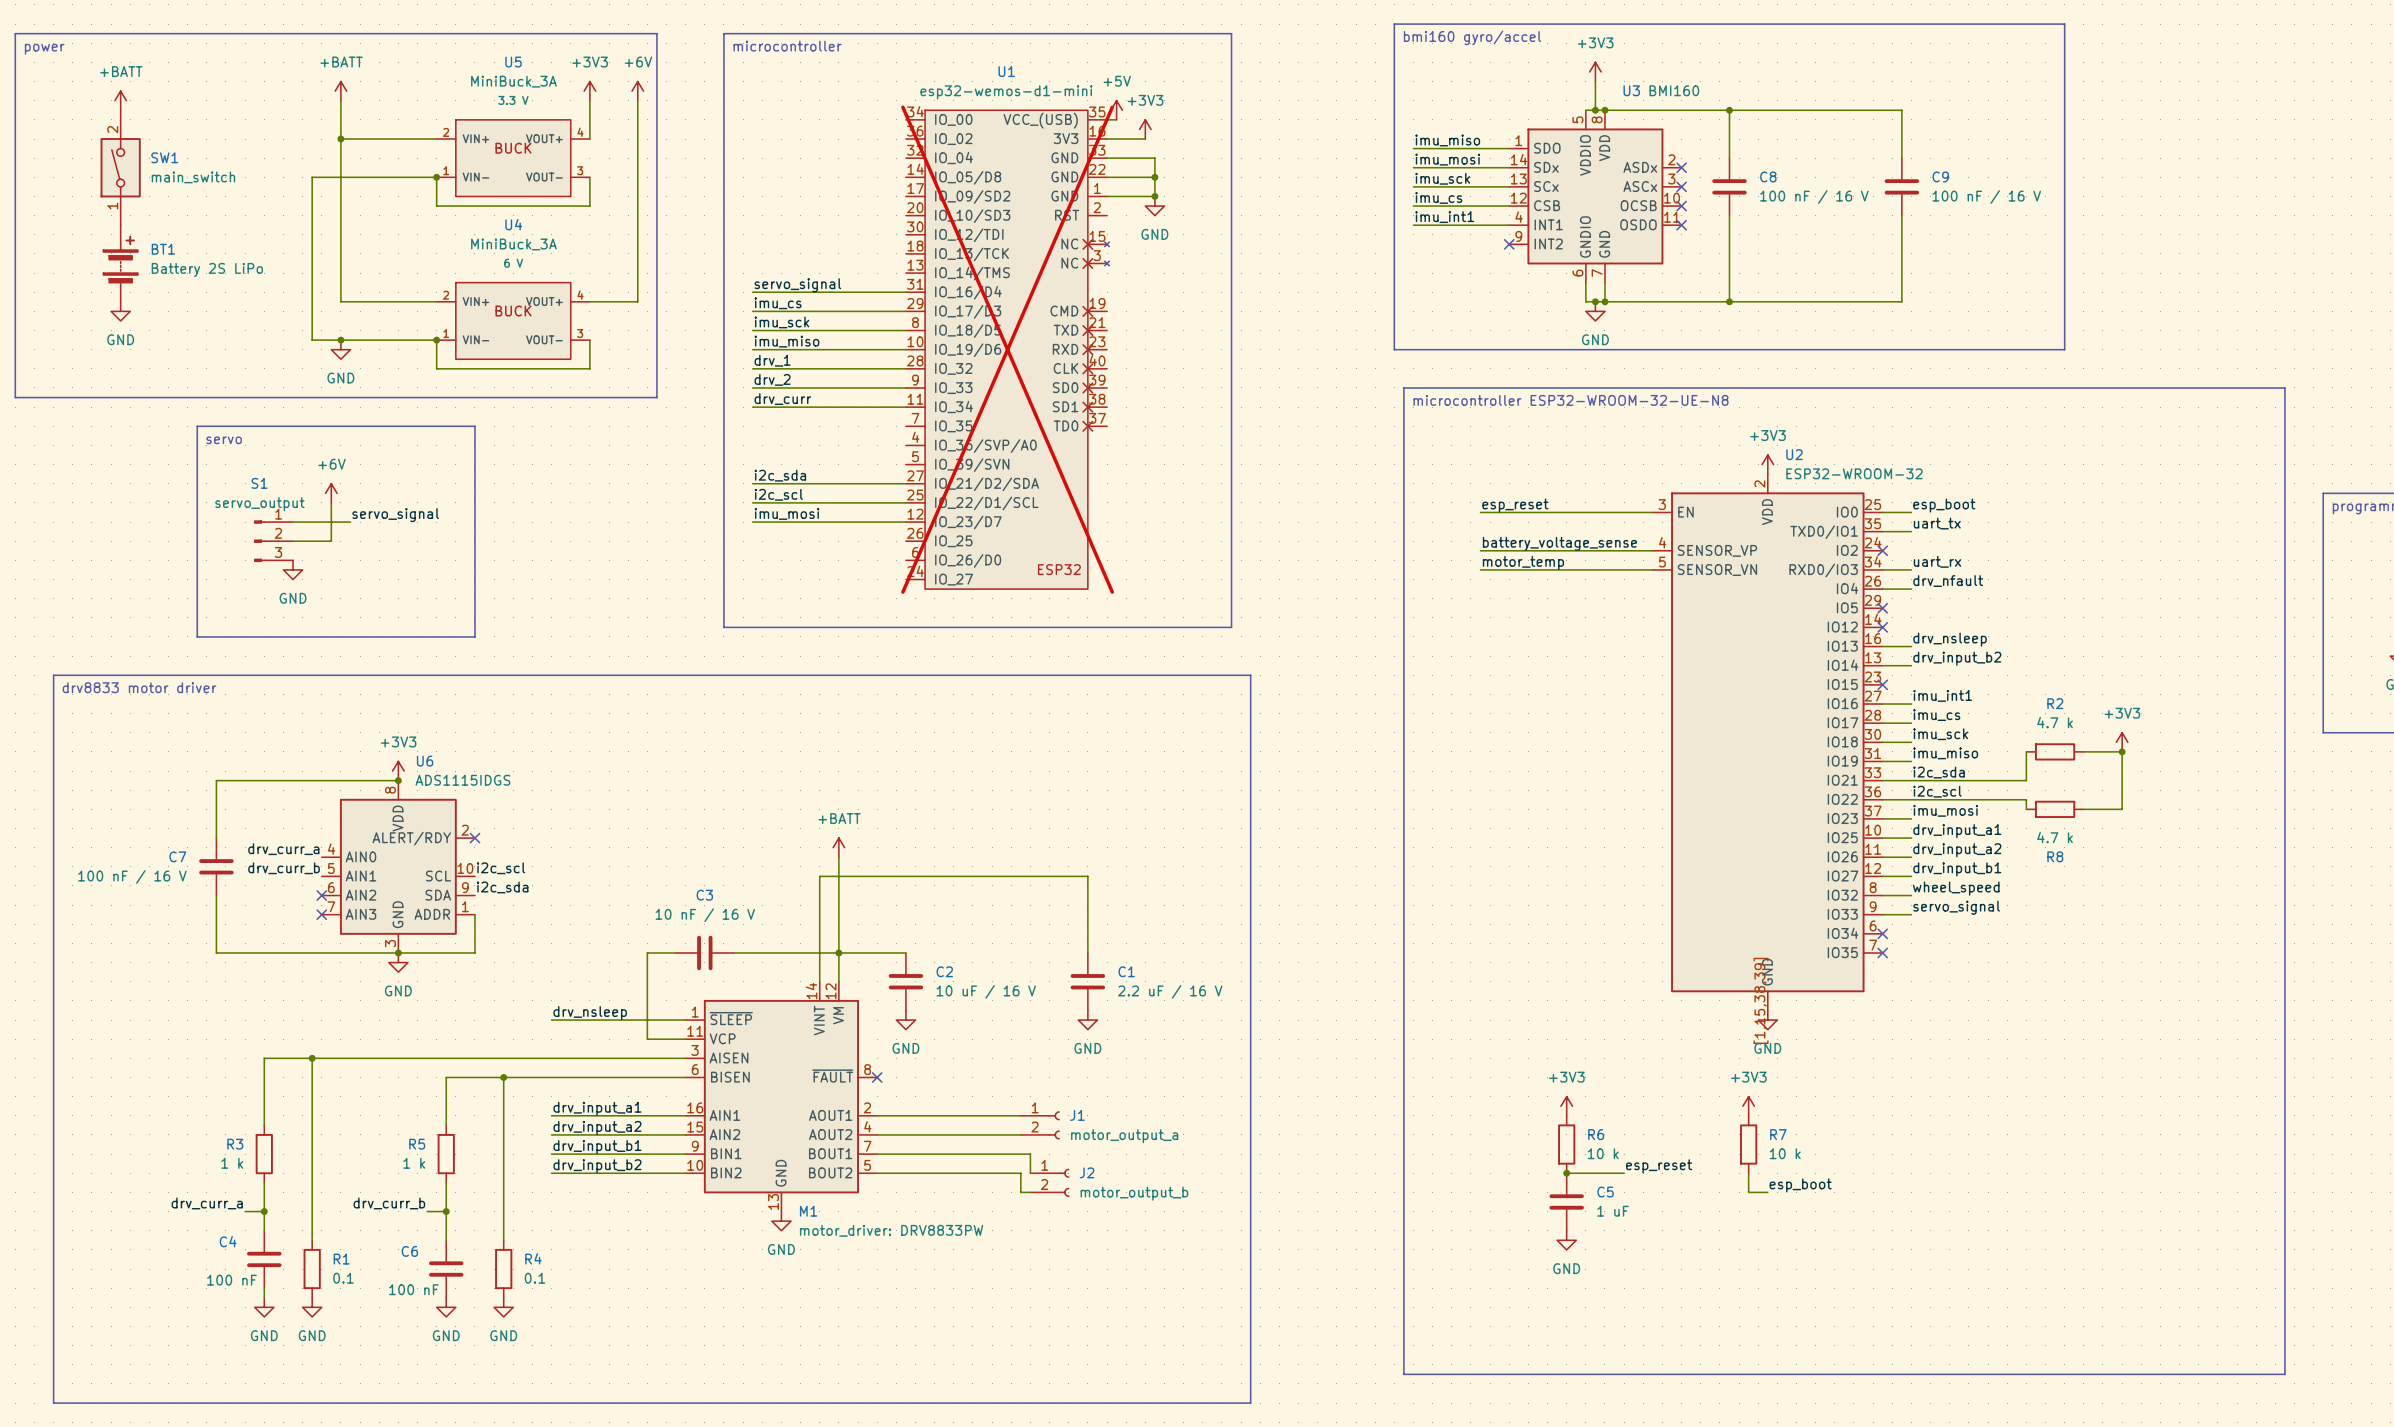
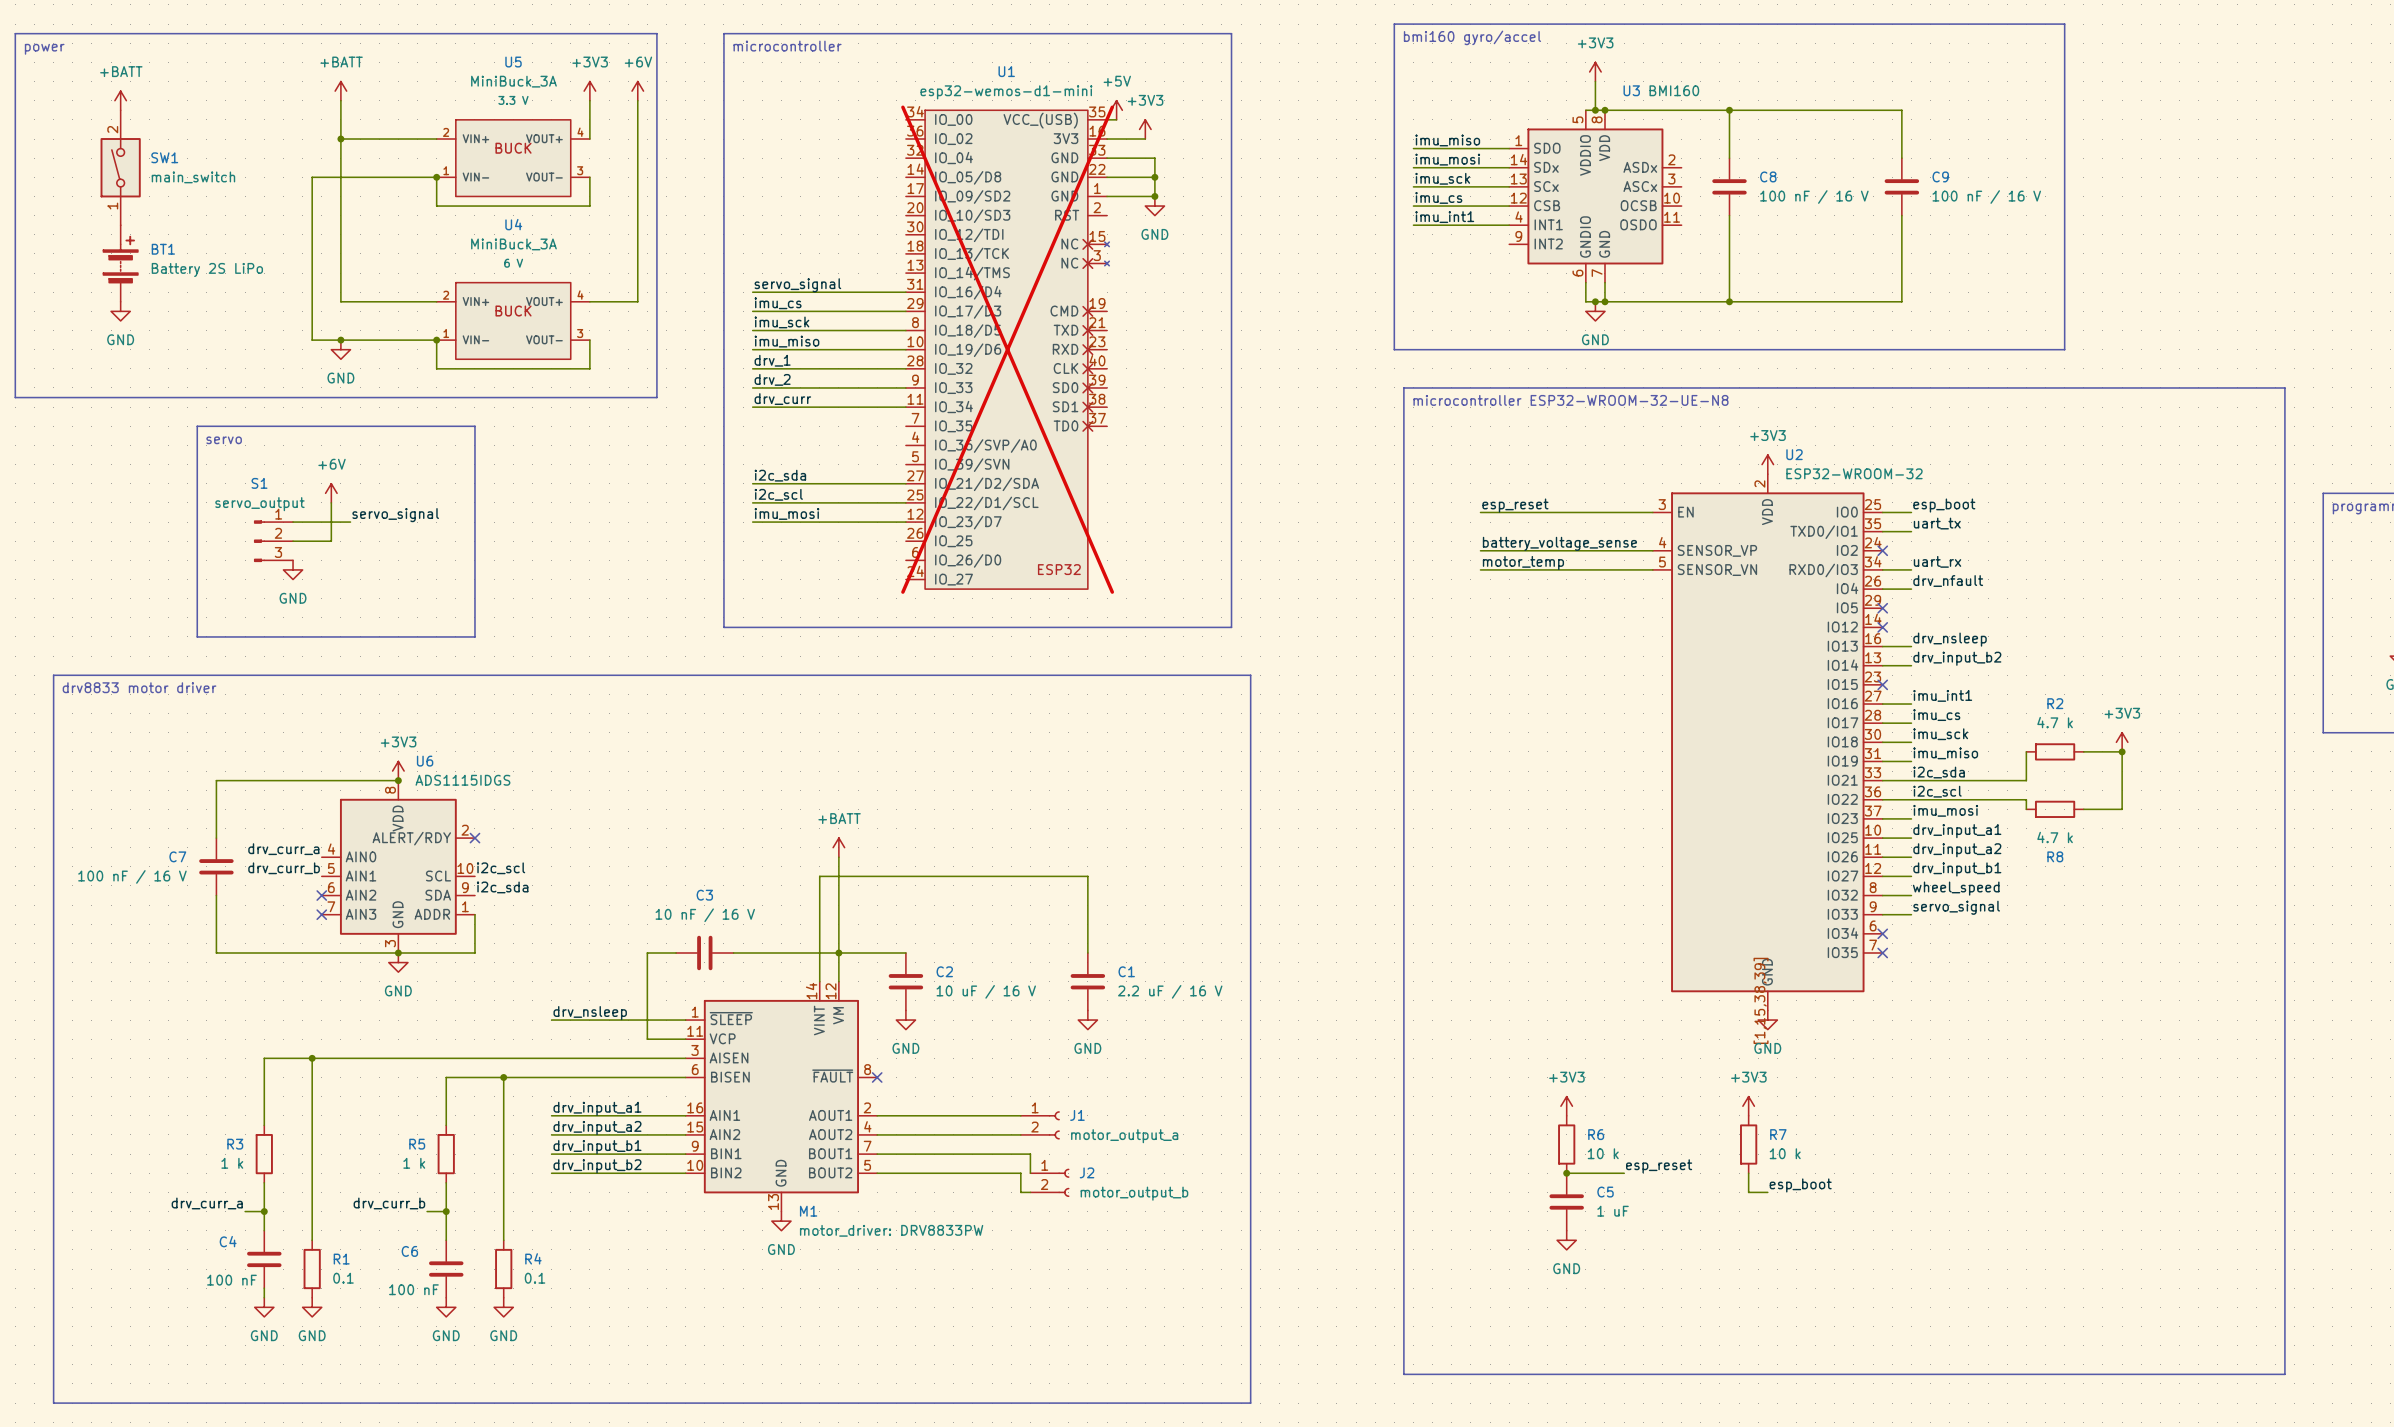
no-connect mark: (1681, 167) -> none
no-connect mark: (1681, 186) -> none
no-connect mark: (1681, 206) -> none
no-connect mark: (1681, 225) -> none
no-connect mark: (1509, 244) -> none

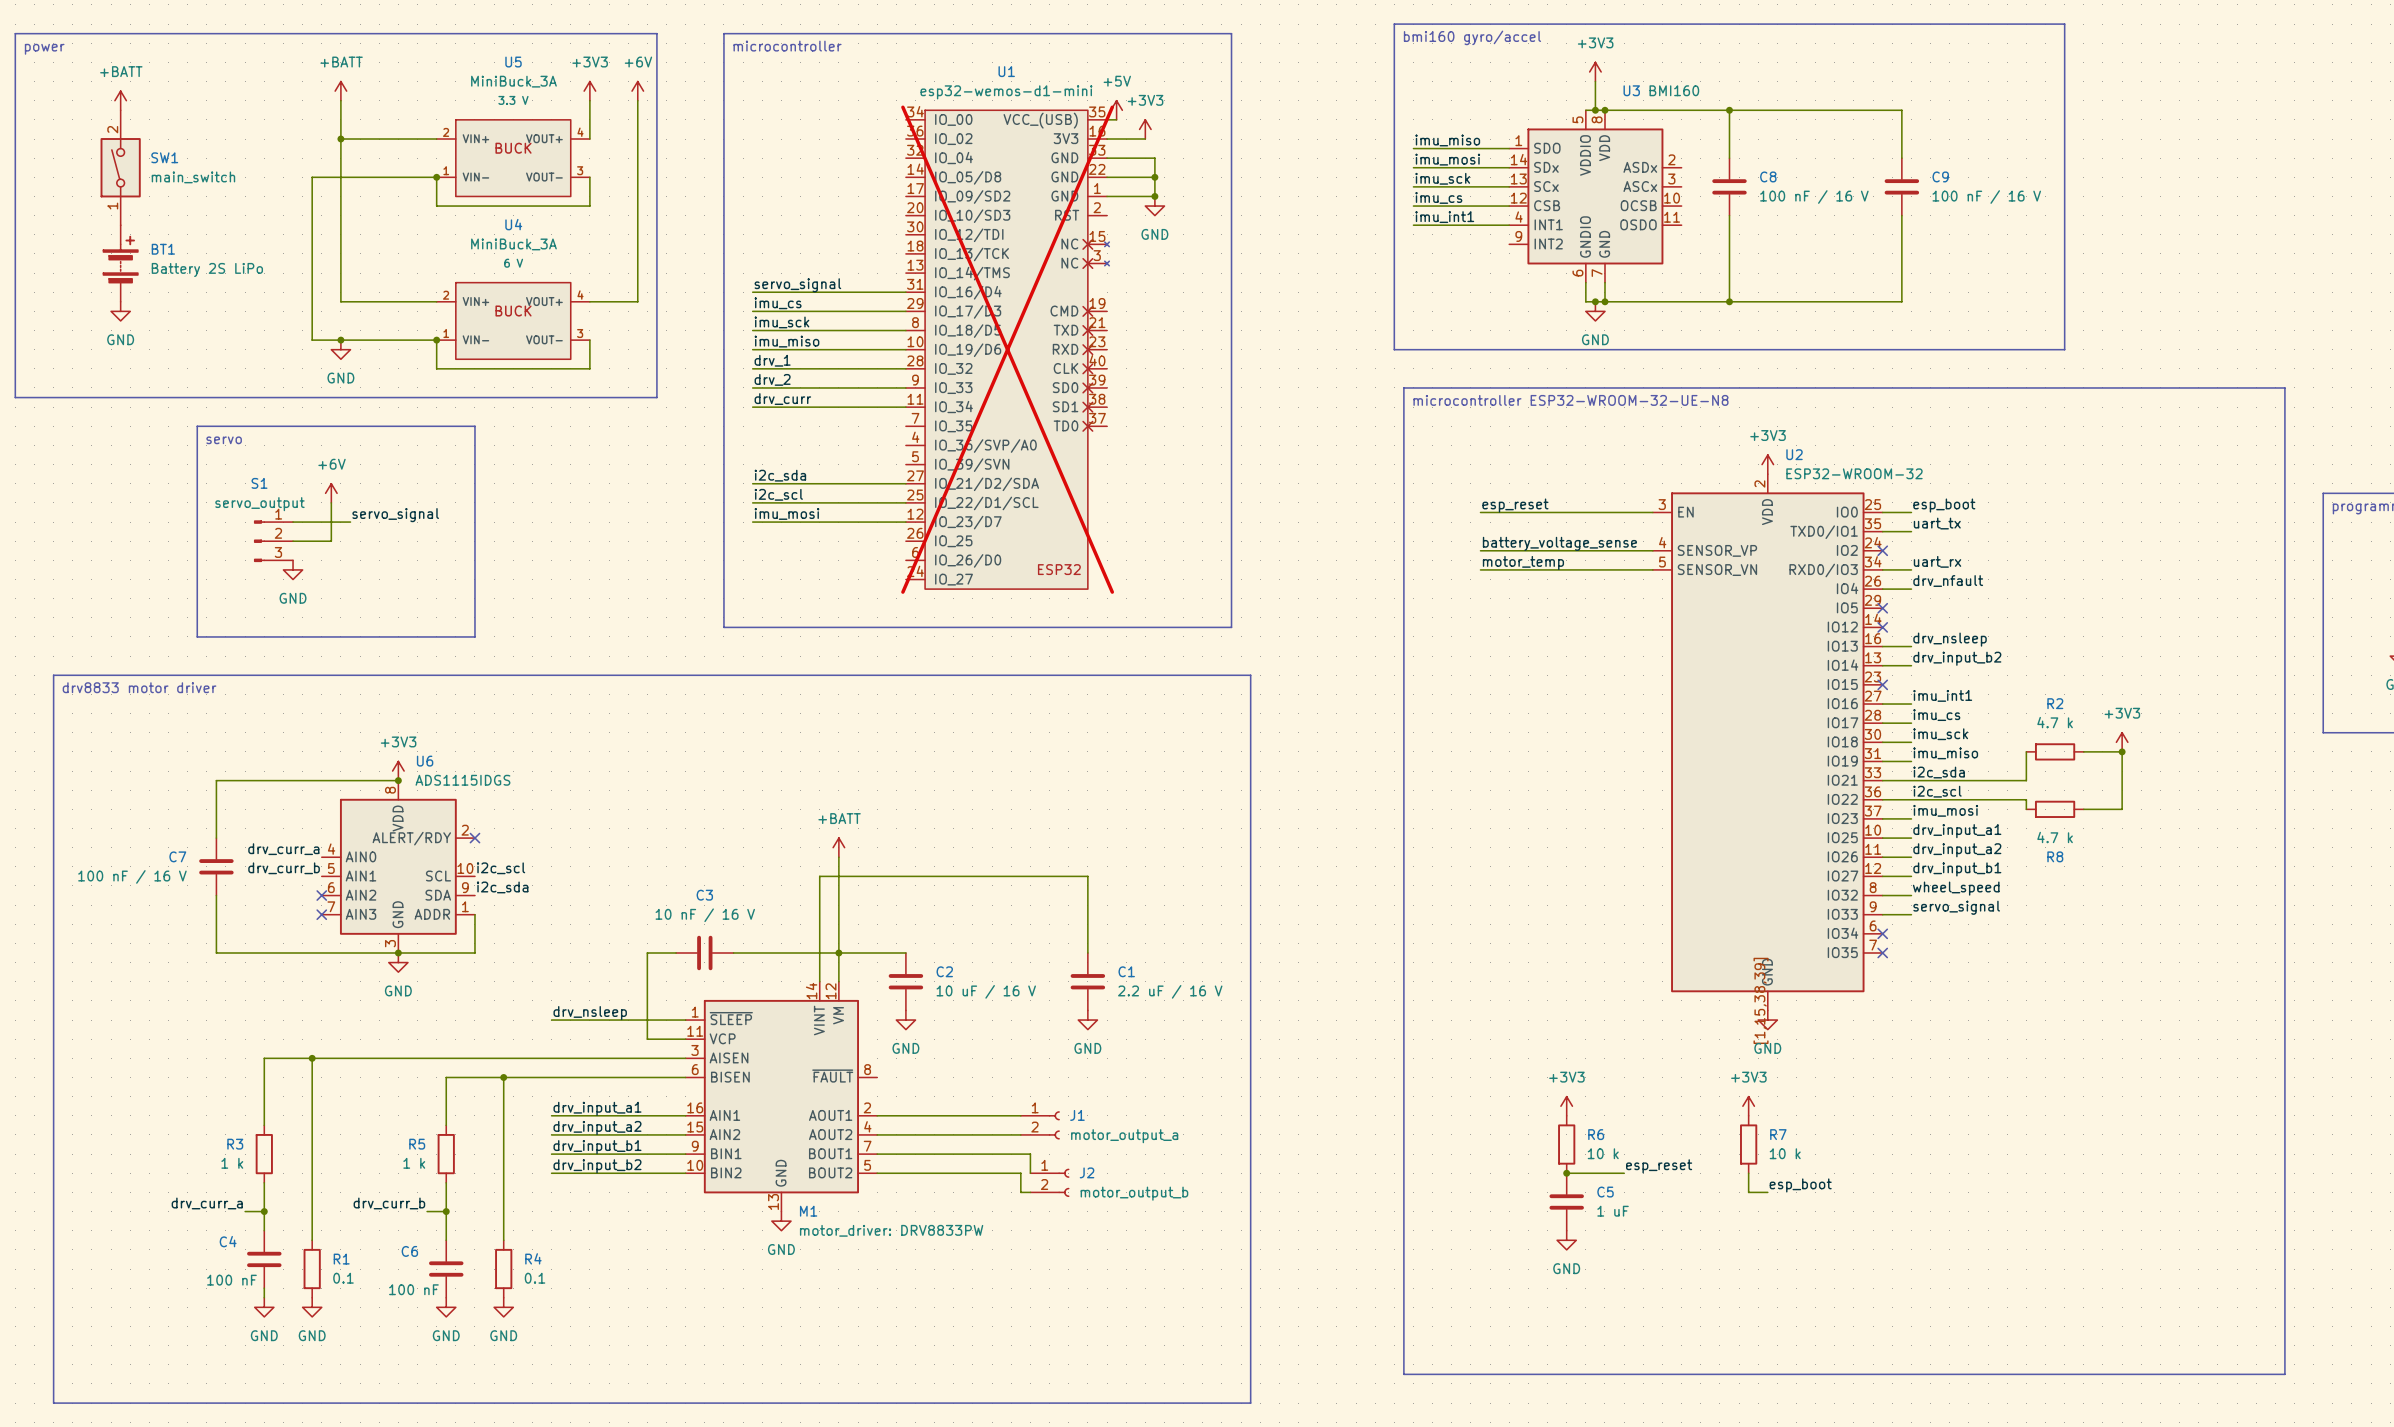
no-connect mark: (877, 1077) -> none

